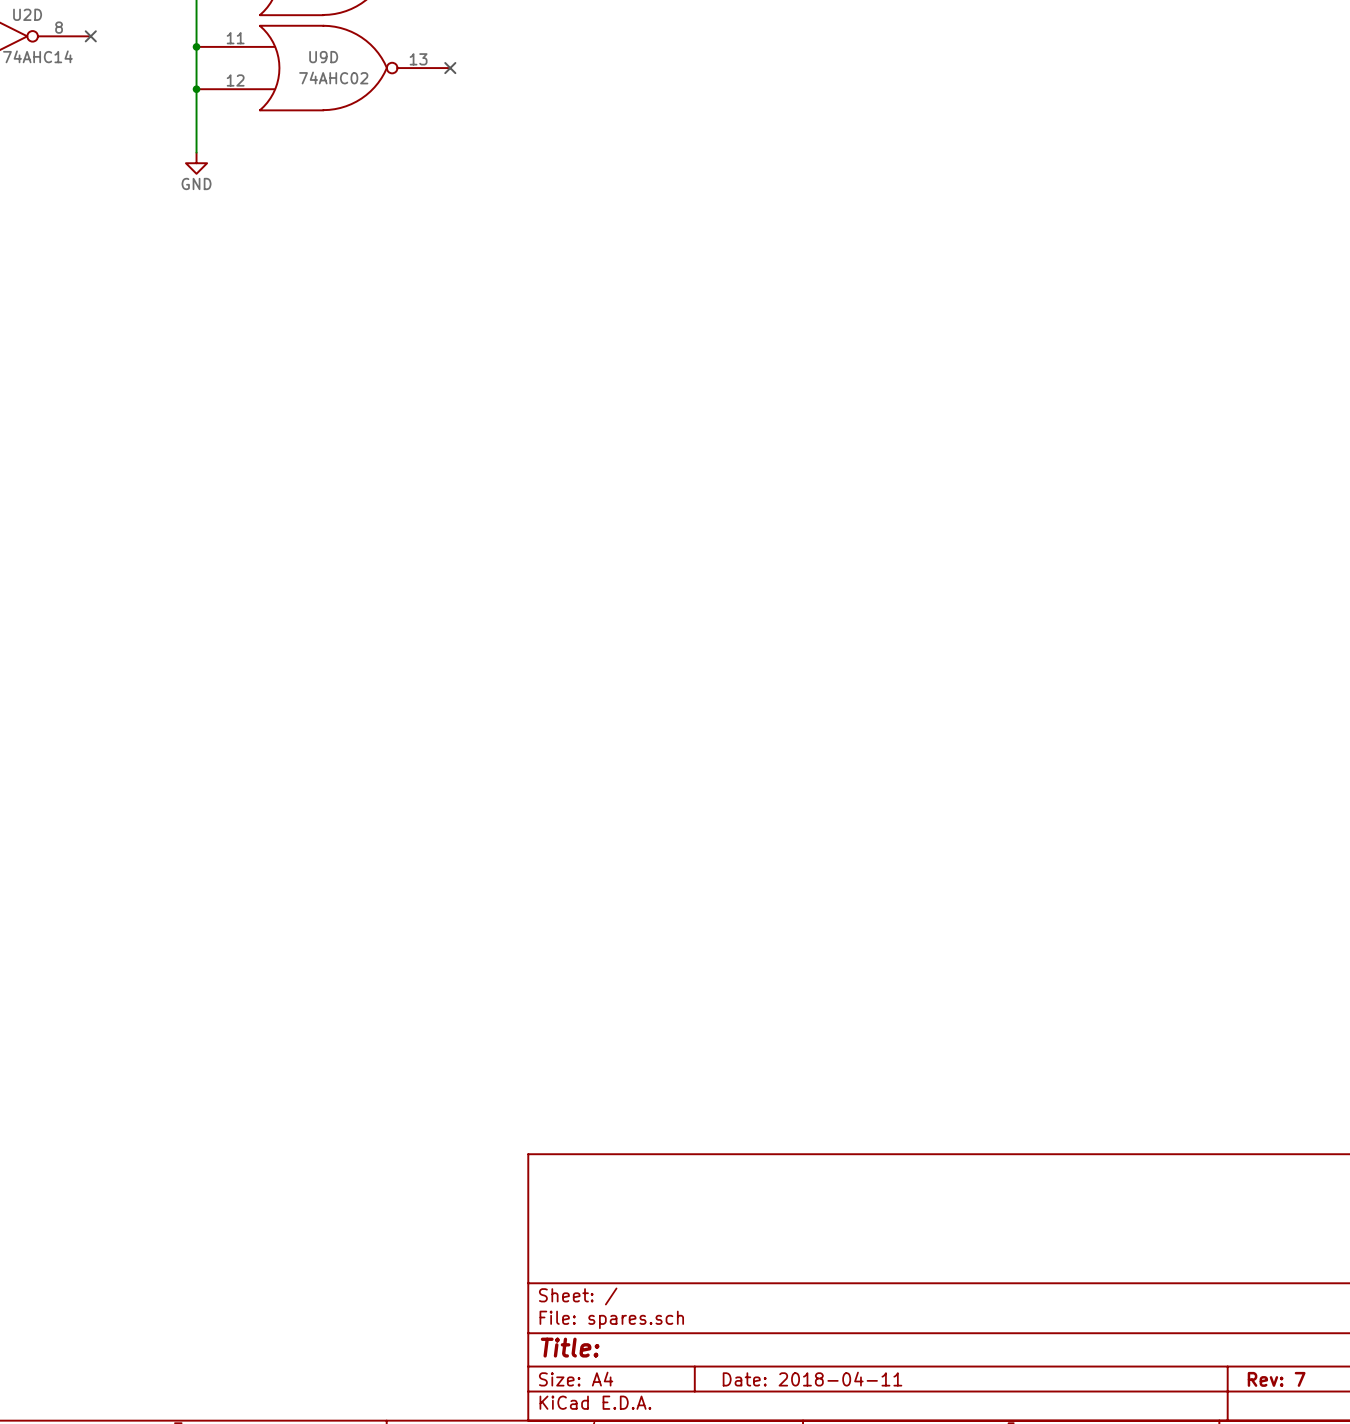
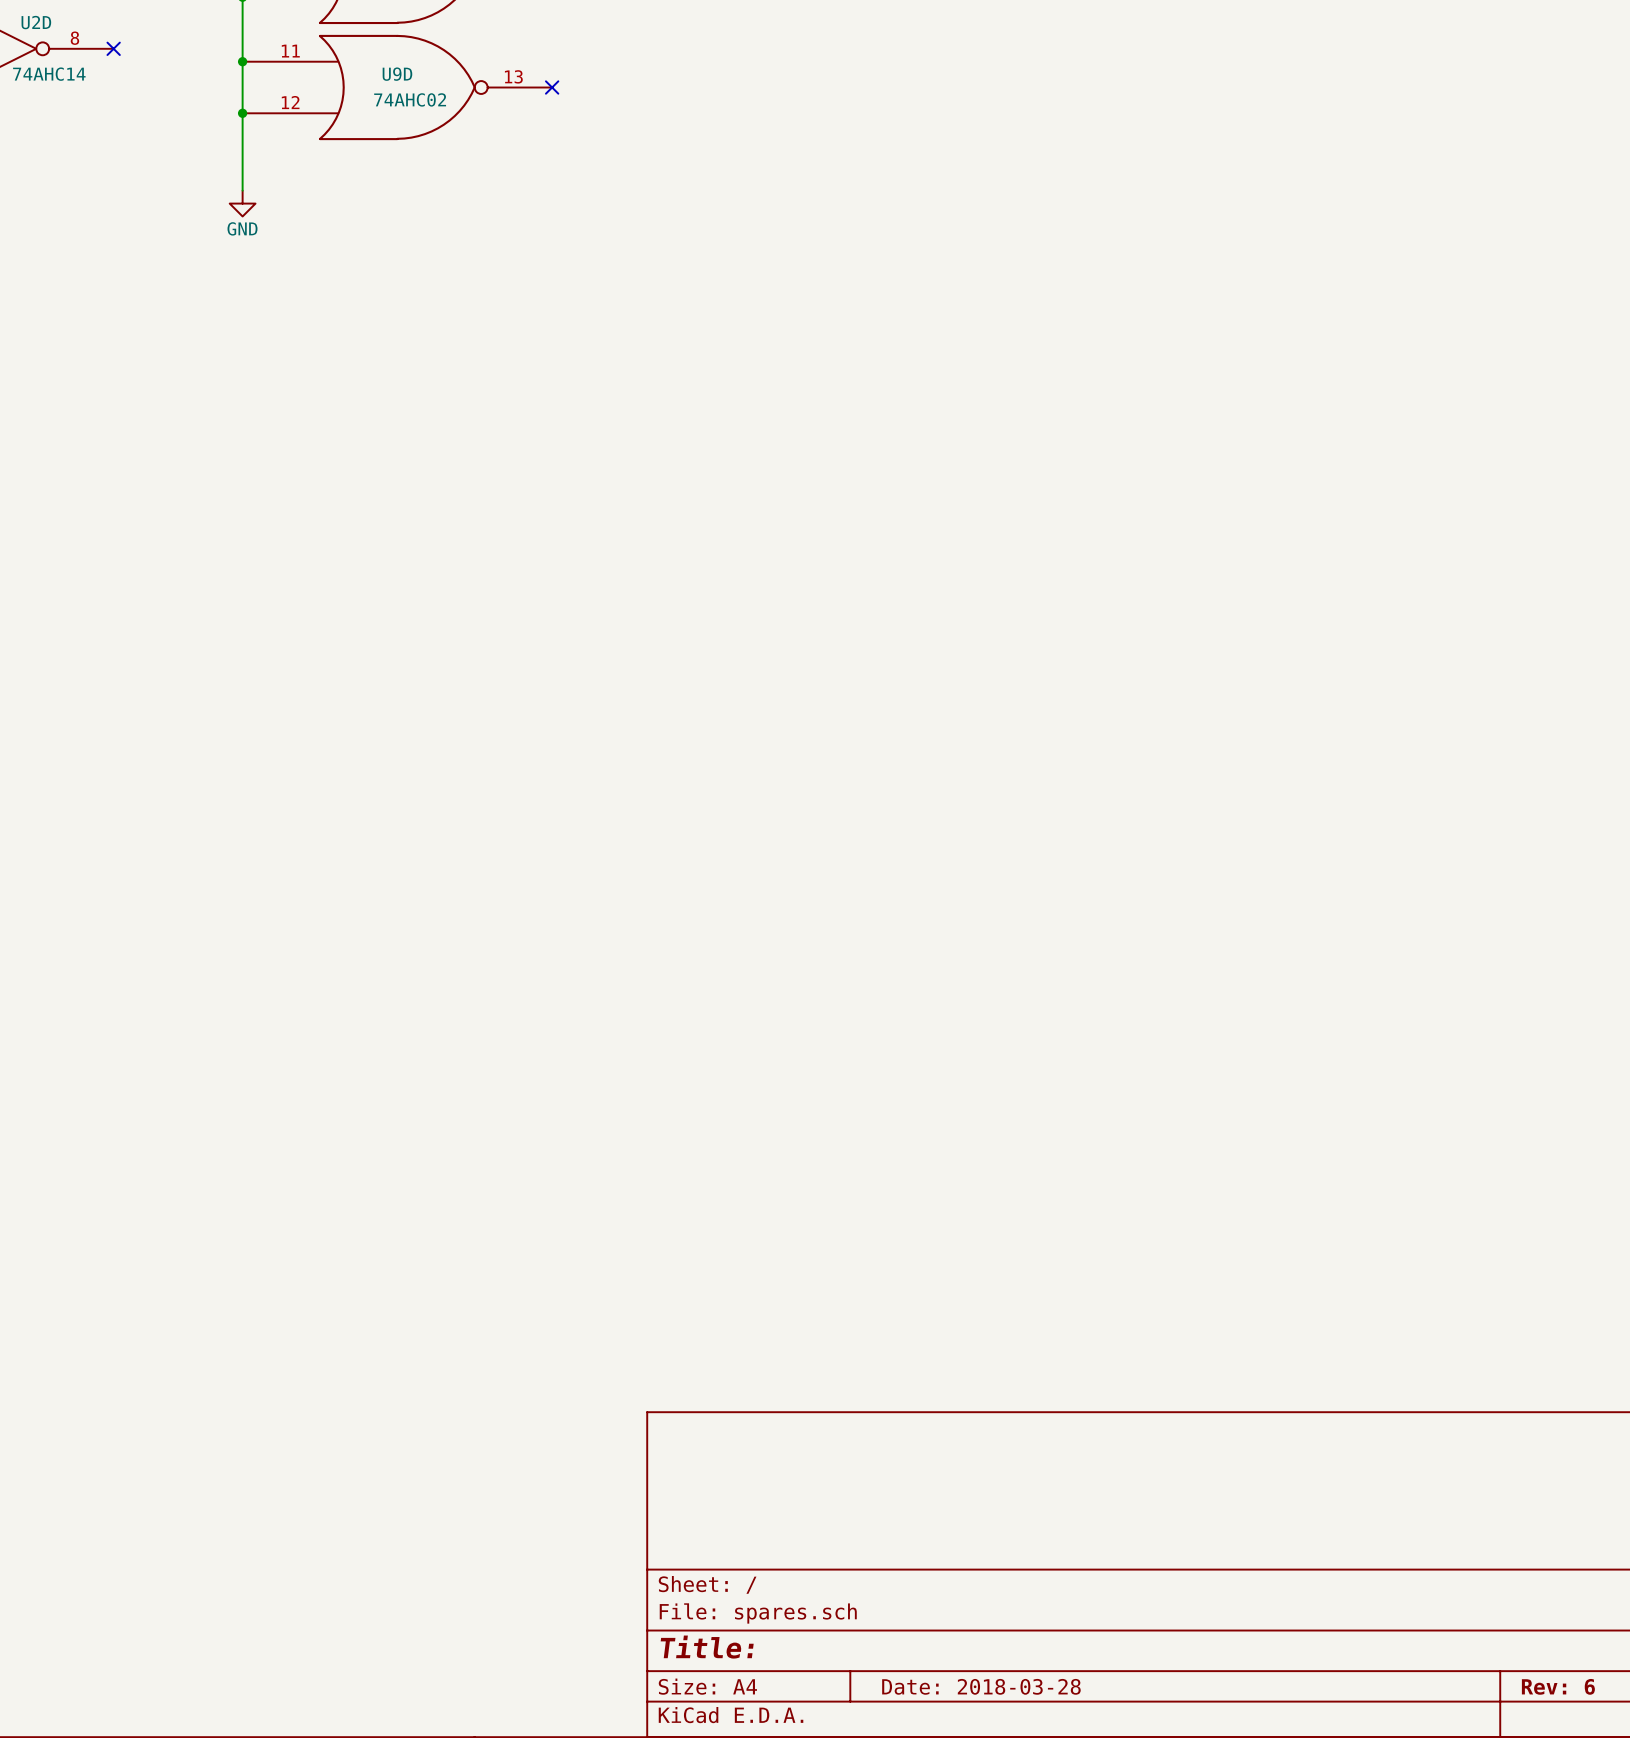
title block: Date: 2018-04-11 (812, 1379) -> Date: 2018-03-28 (981, 1686)
title block: Rev: 7 (1276, 1379) -> Rev: 6 (1558, 1686)

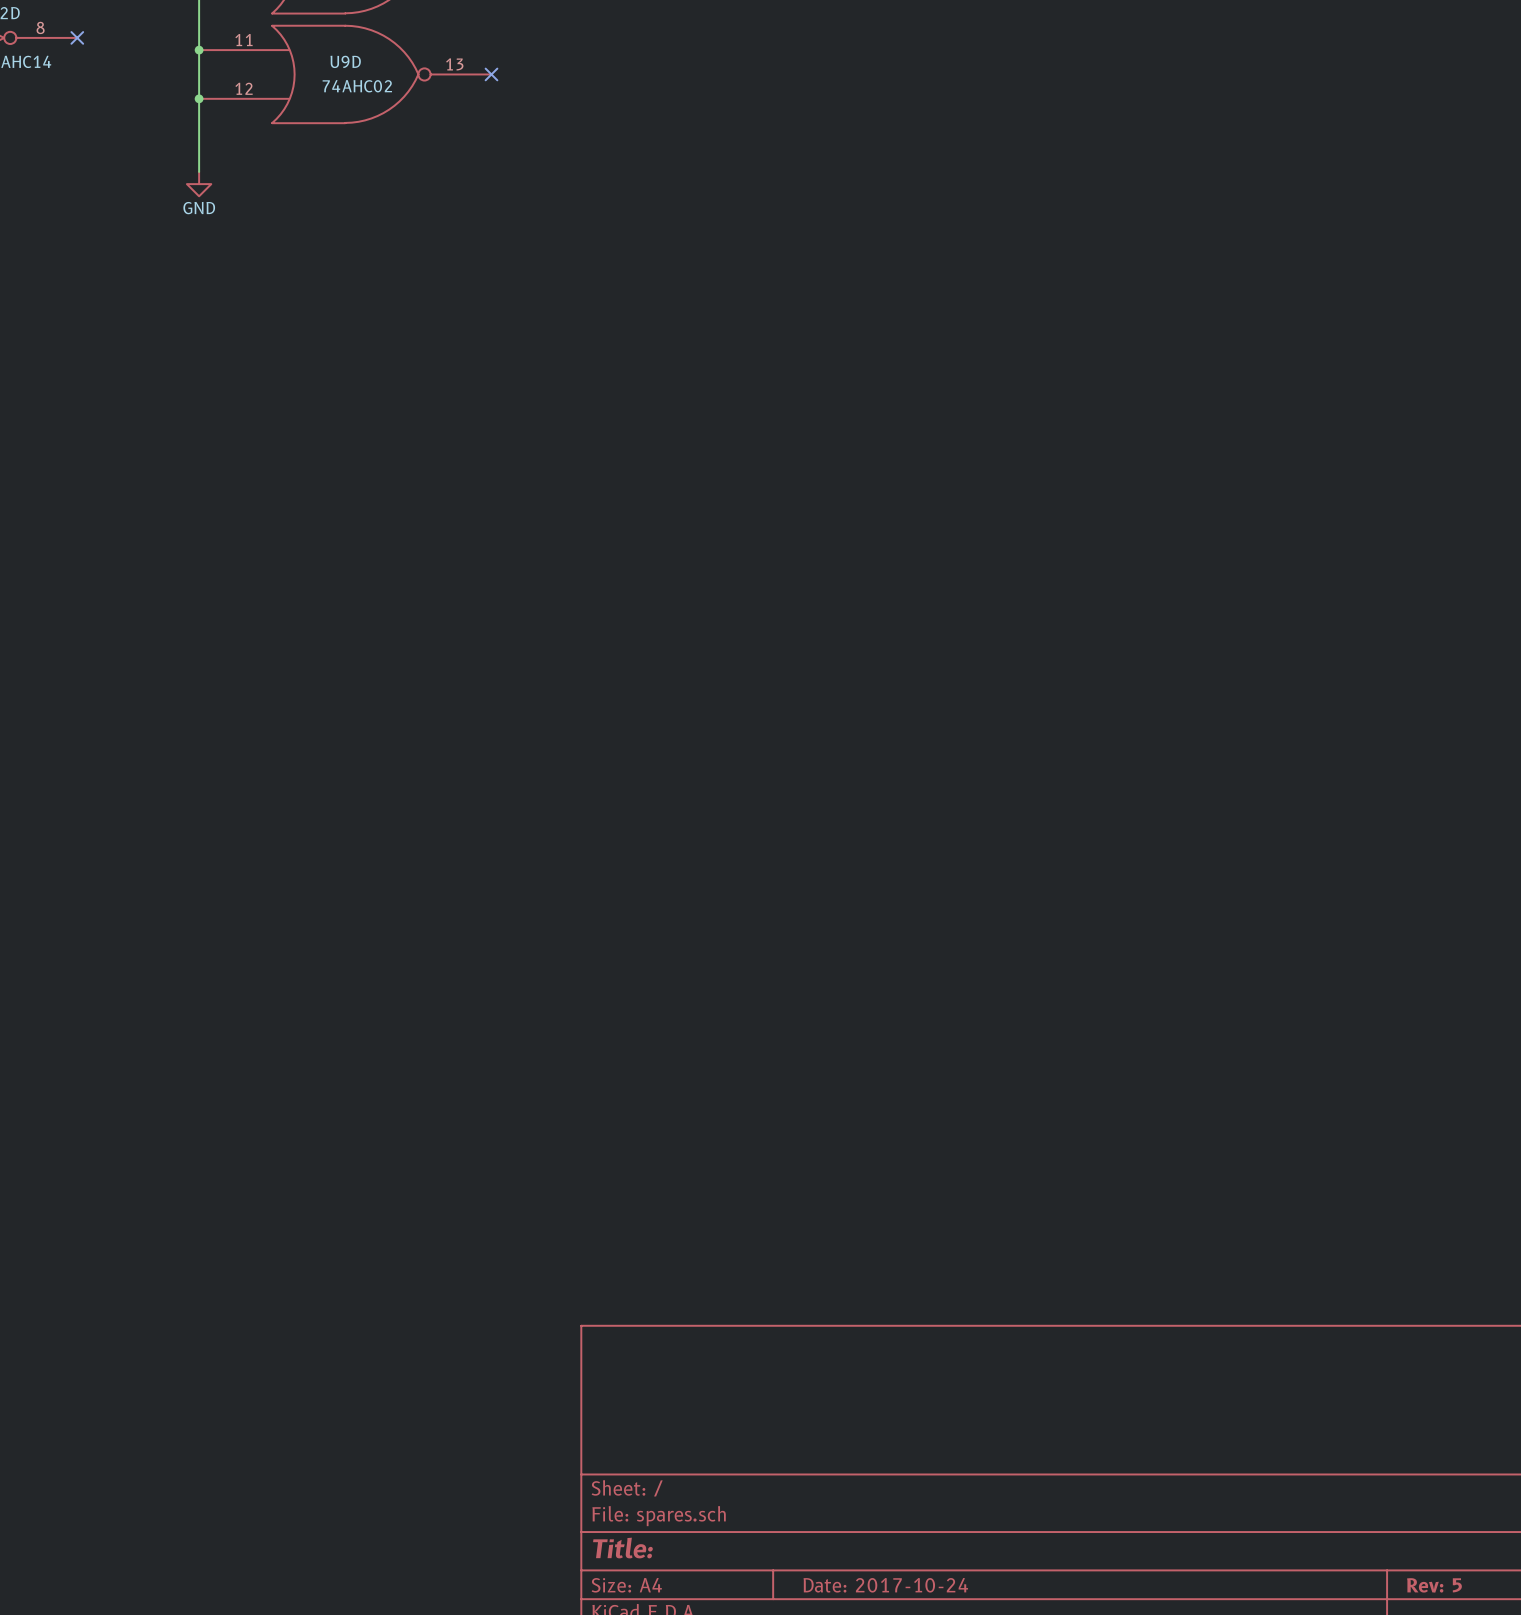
title block: Date: 2018-03-28 (981, 1686) -> Date: 2017-10-24 (885, 1585)
title block: Rev: 6 (1558, 1686) -> Rev: 5 (1434, 1585)

